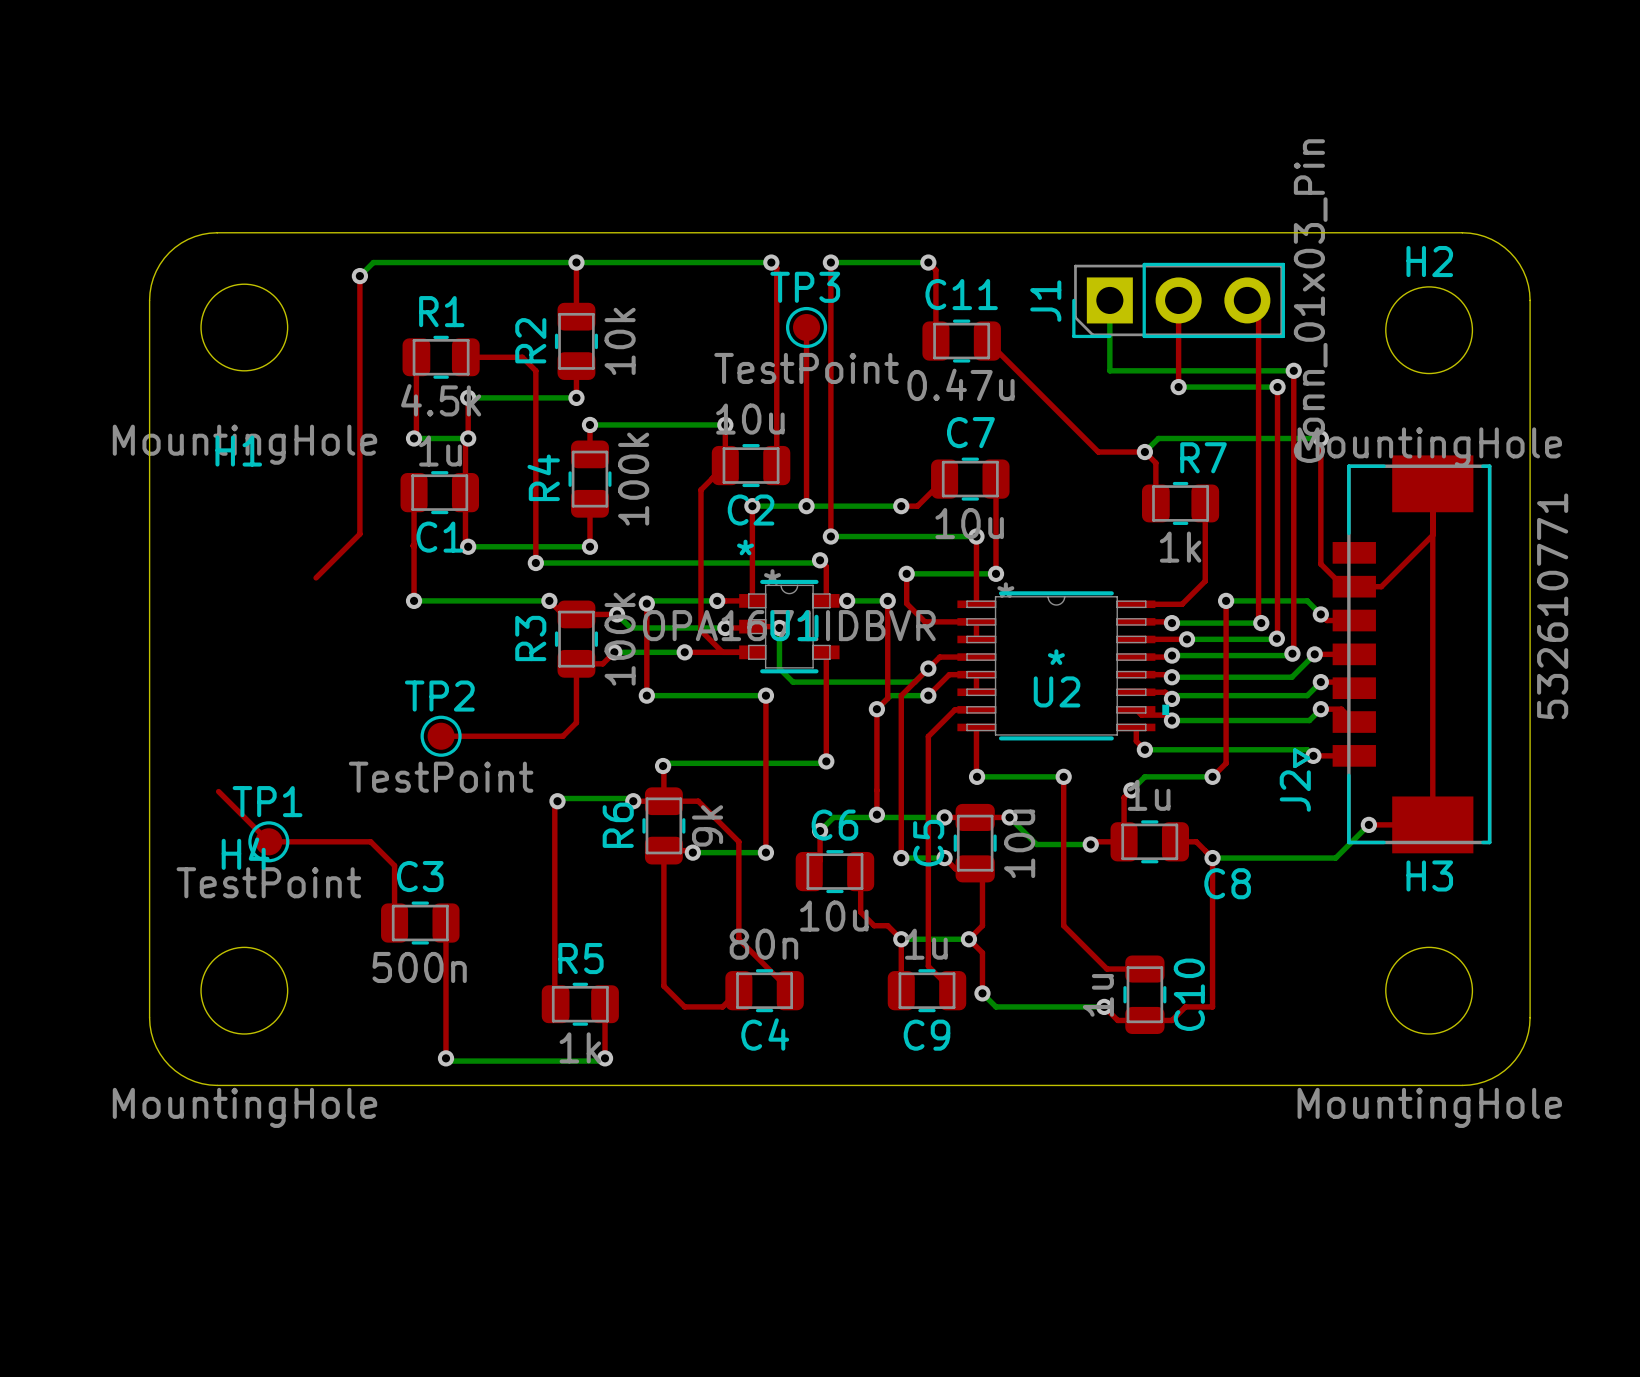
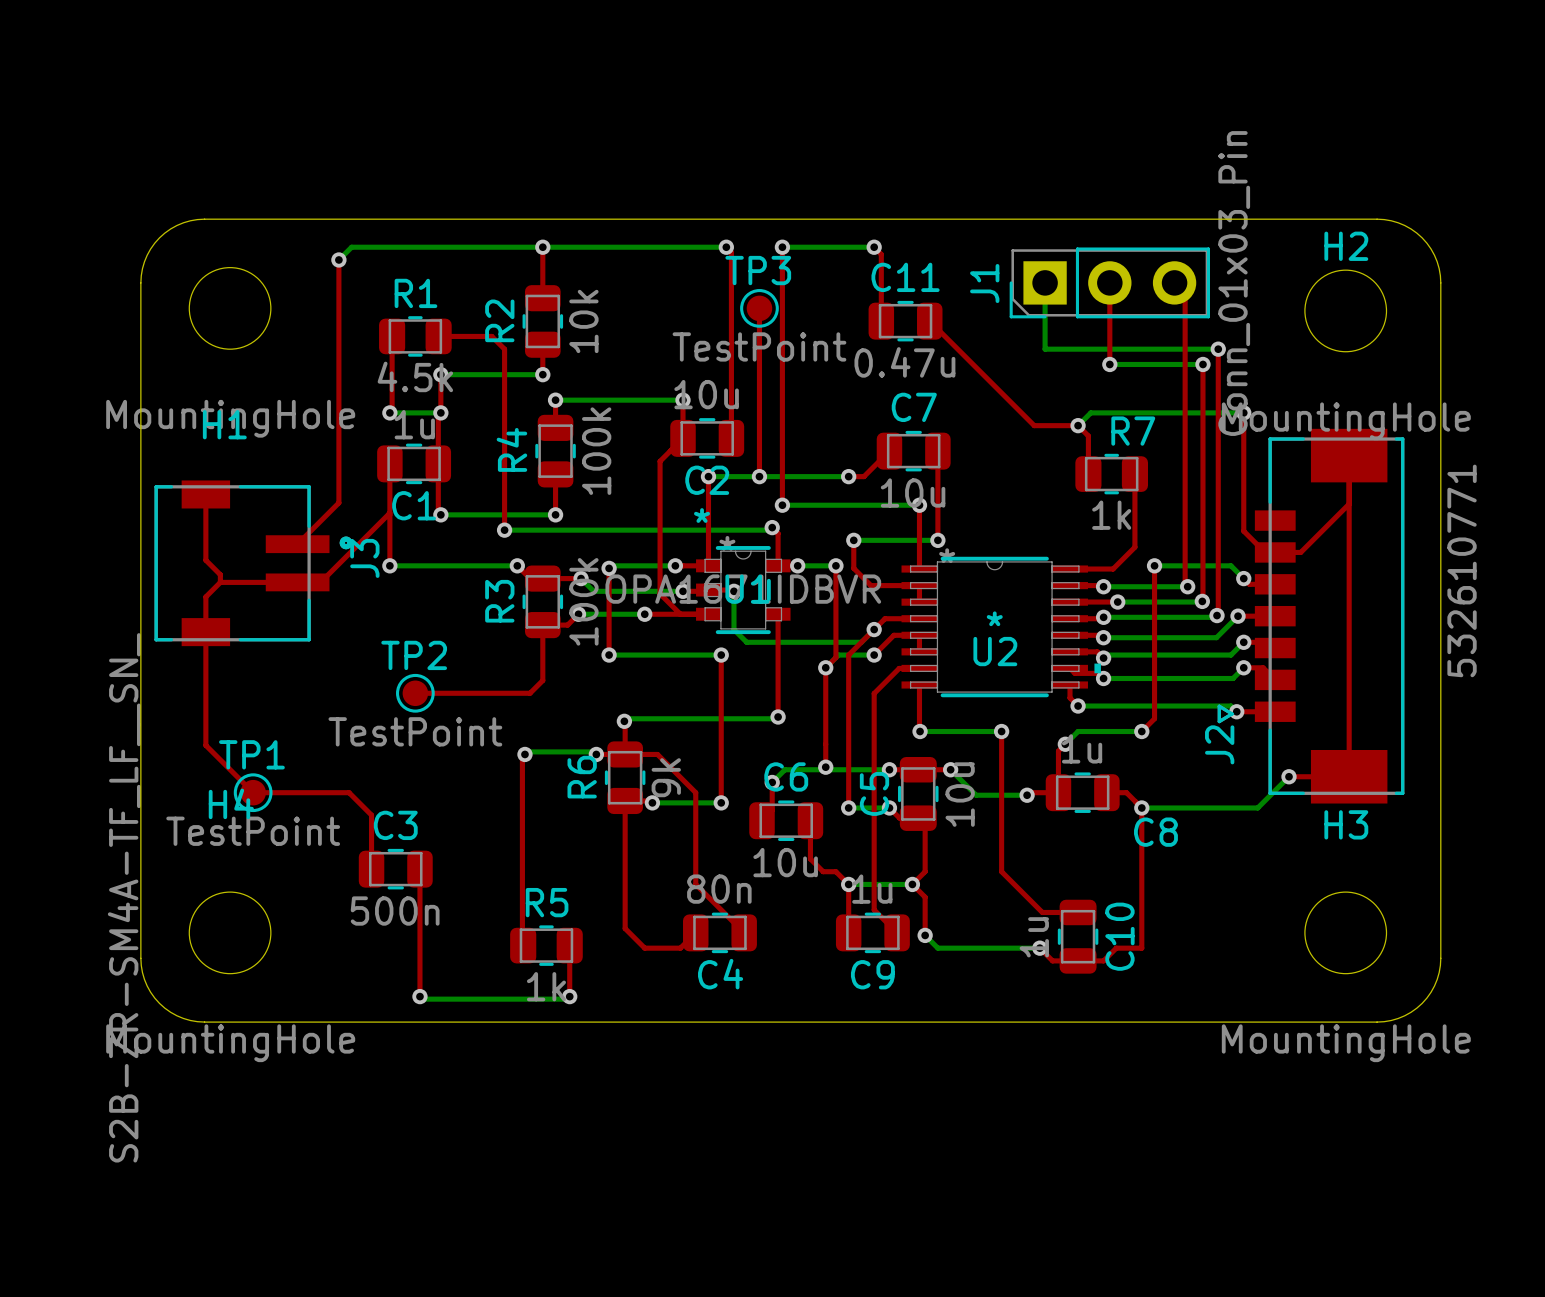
top track: none -> (205, 494) (205, 560) (220, 574) (220, 582)
top track: none -> (388, 513) (320, 582) (220, 582)
J3: none -> S2B-ZR-SM4A-TF_LF__SN_ (253, 563)
top track: none -> (220, 582) (205, 596) (205, 745)

